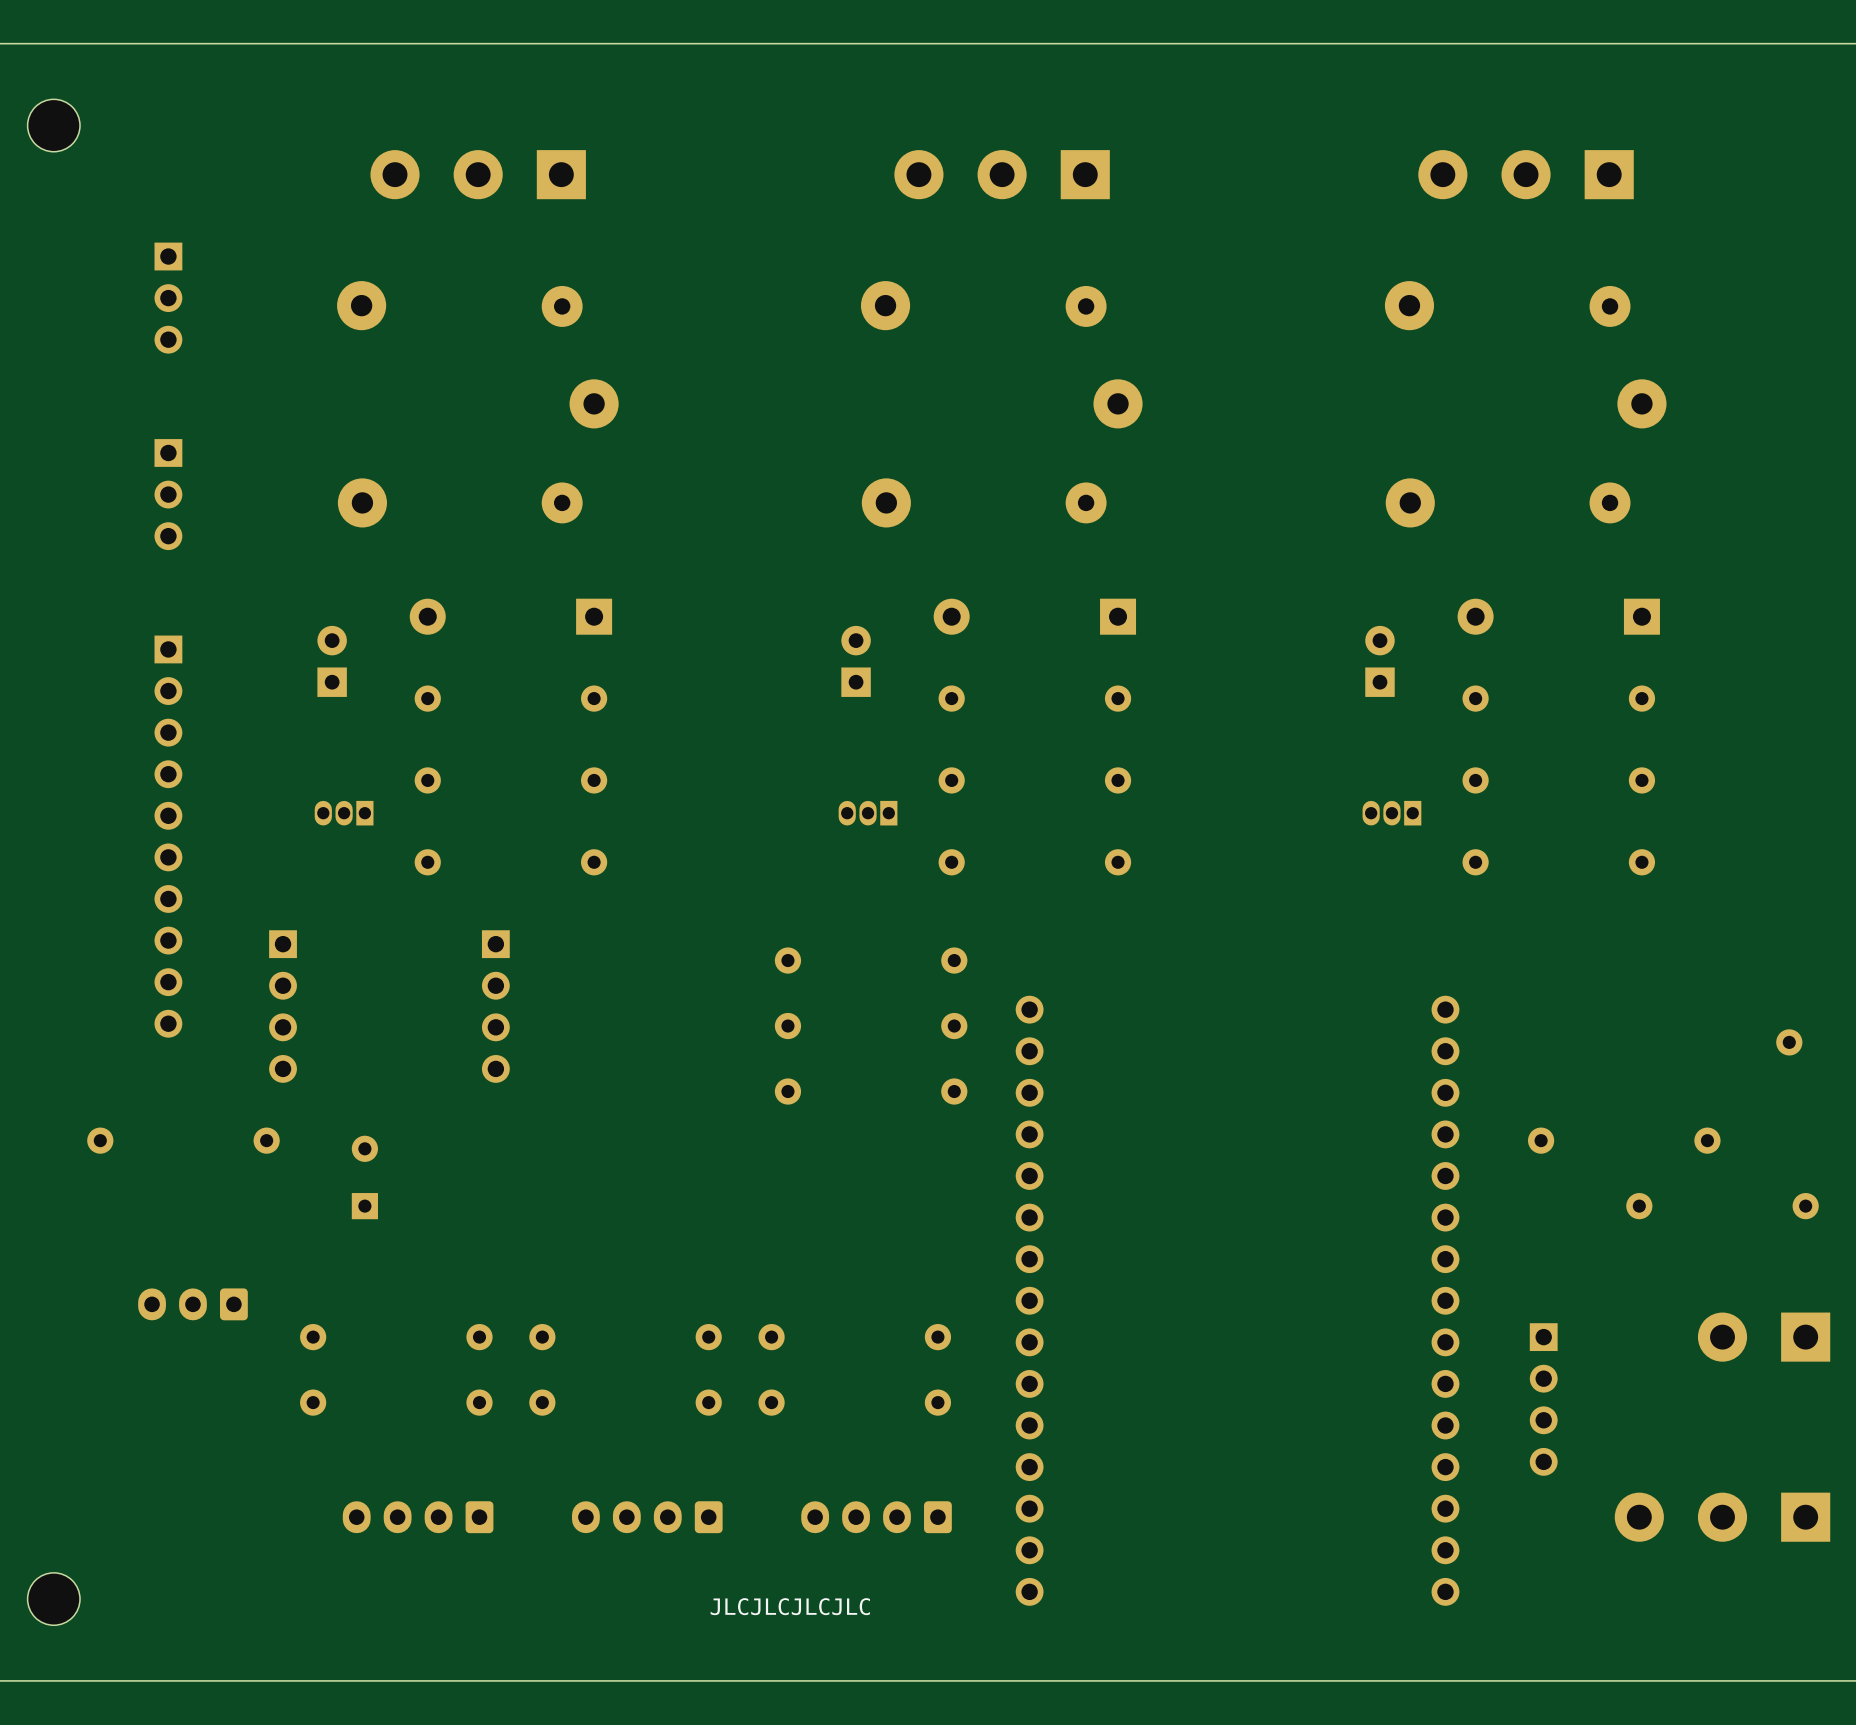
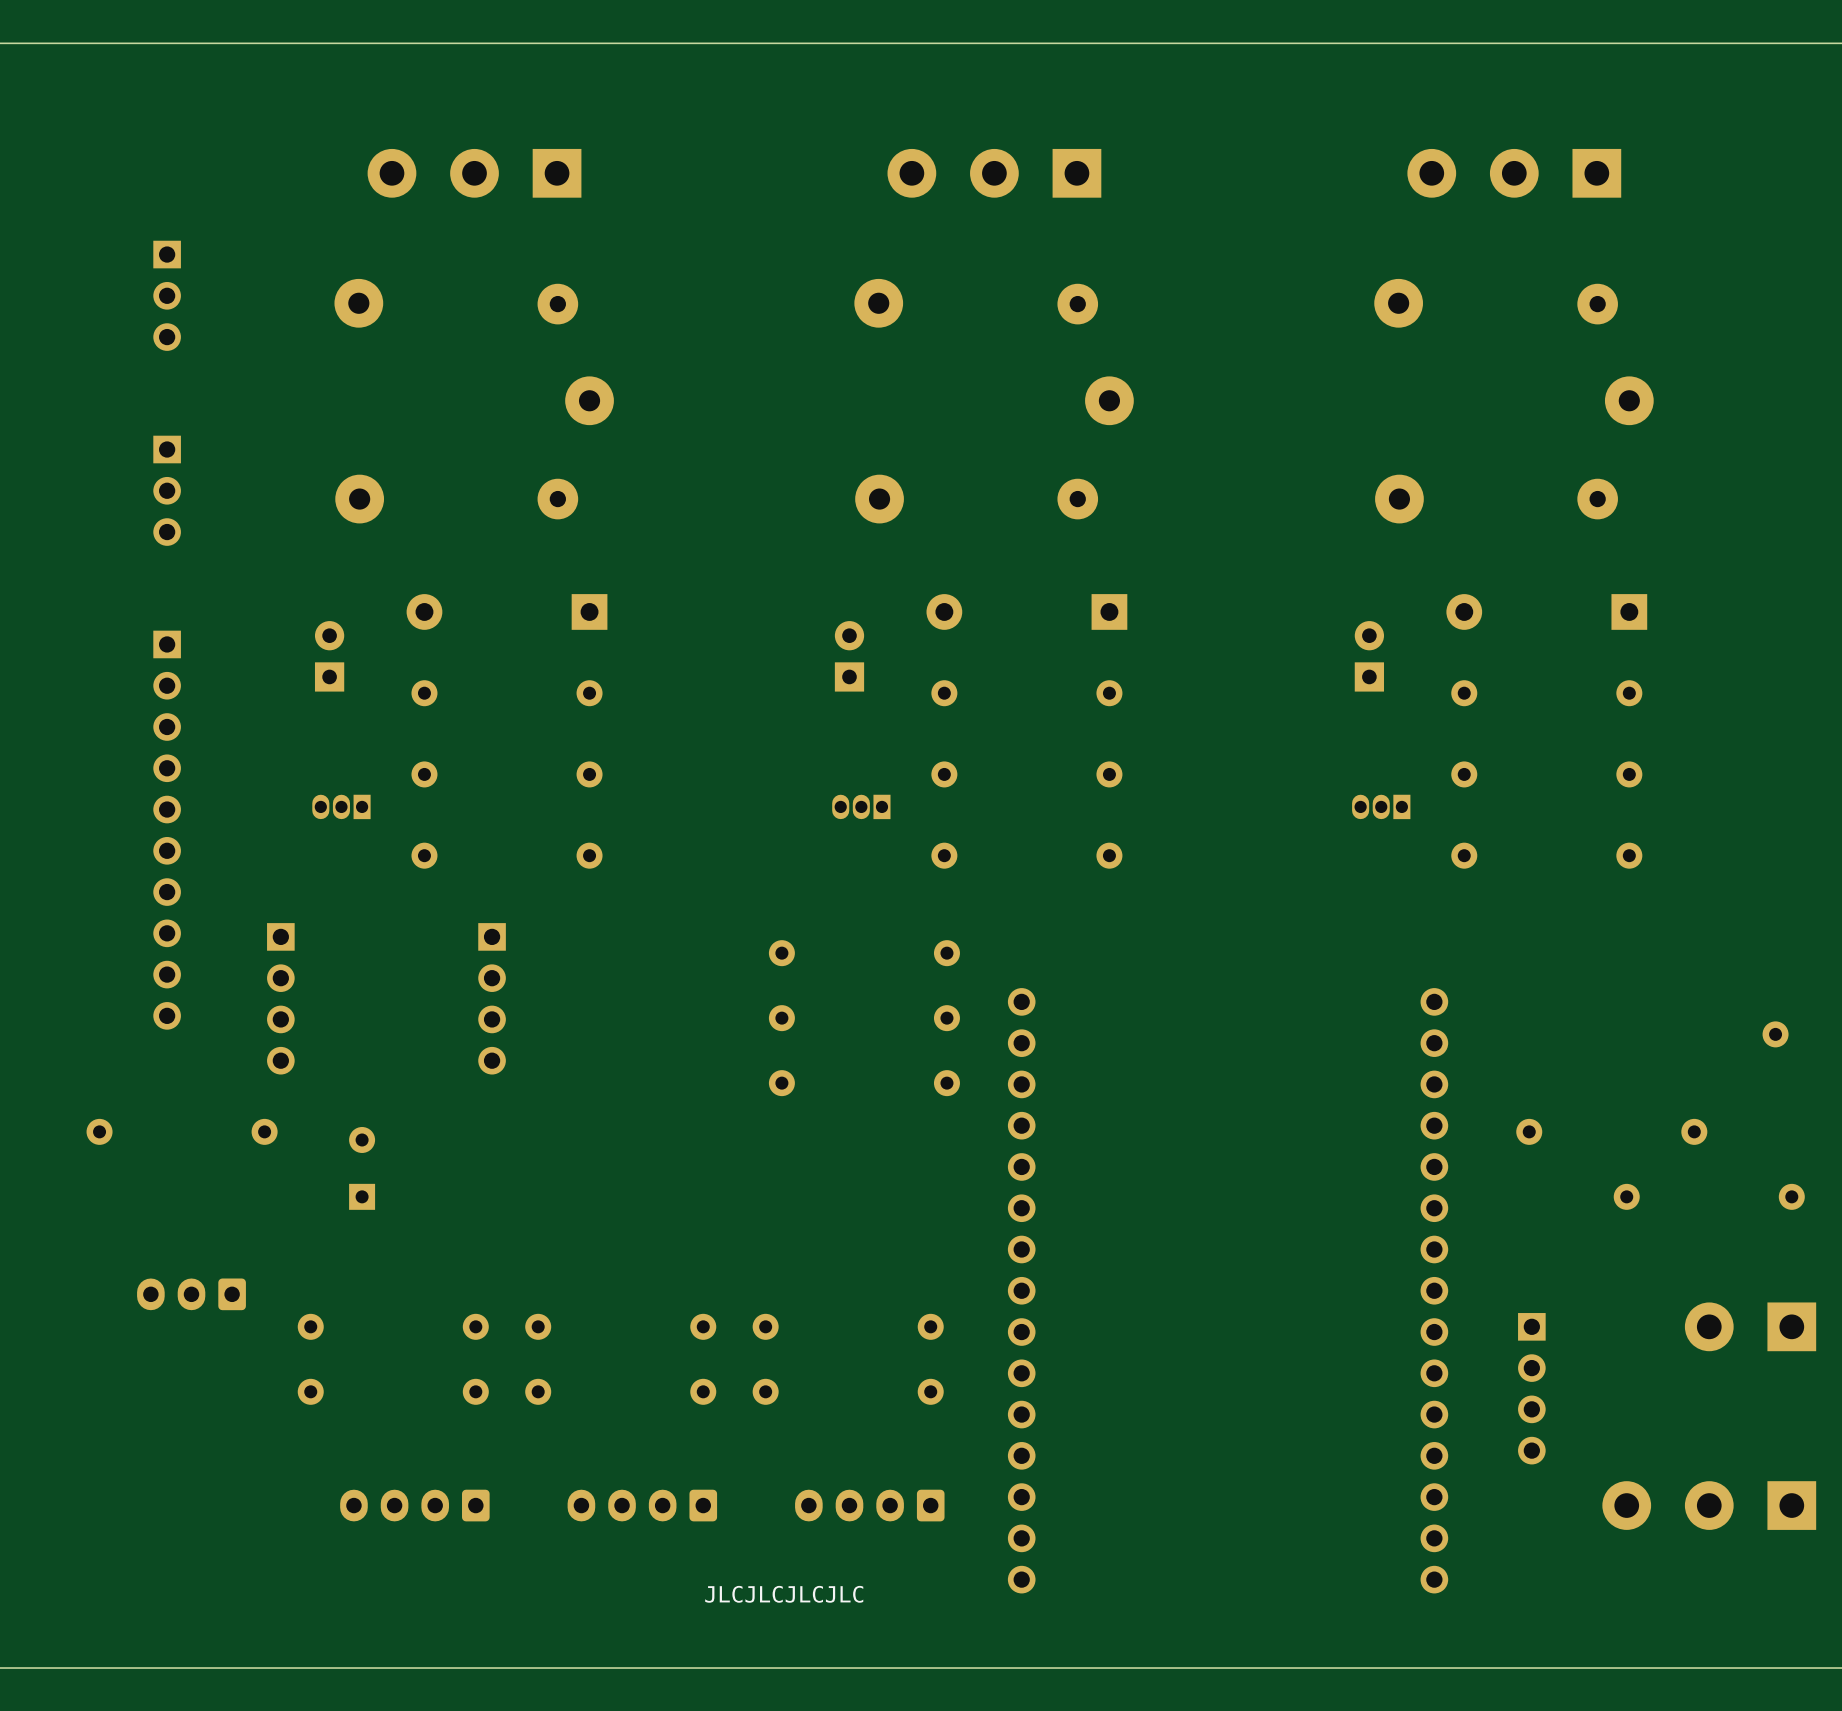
part: (53, 125) -> none
part: (53, 1599) -> none

